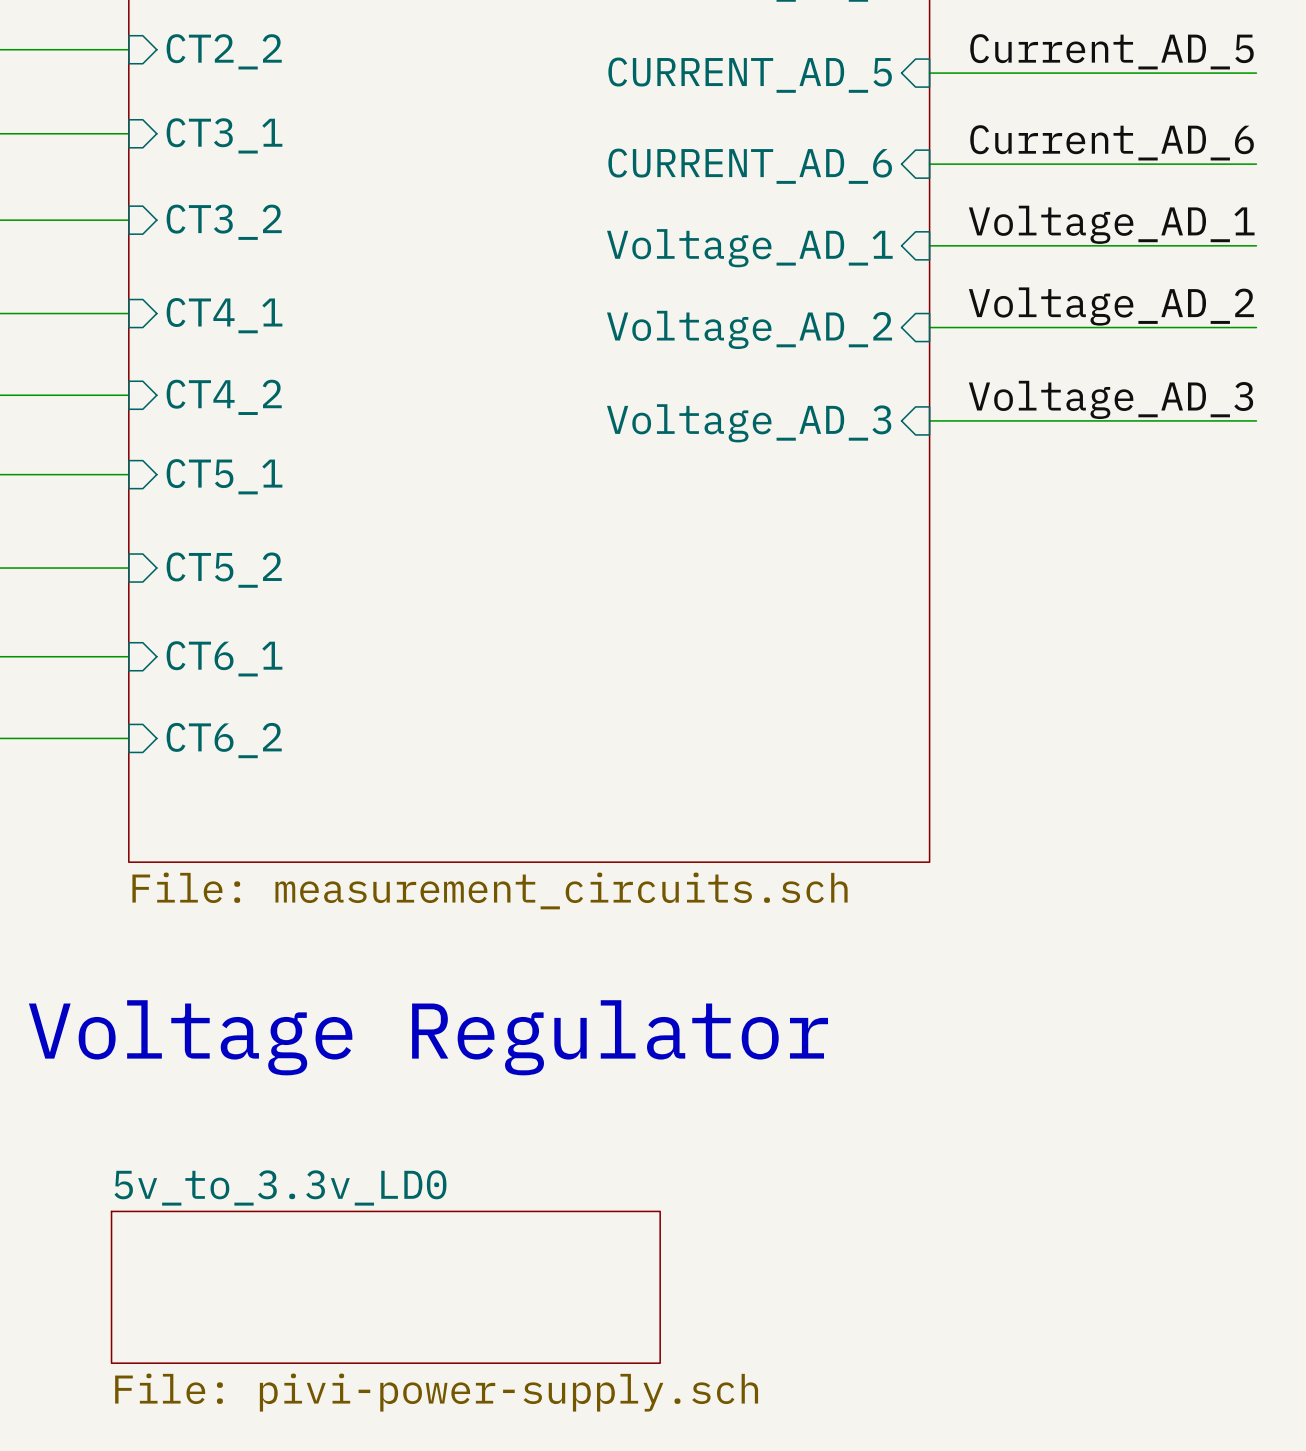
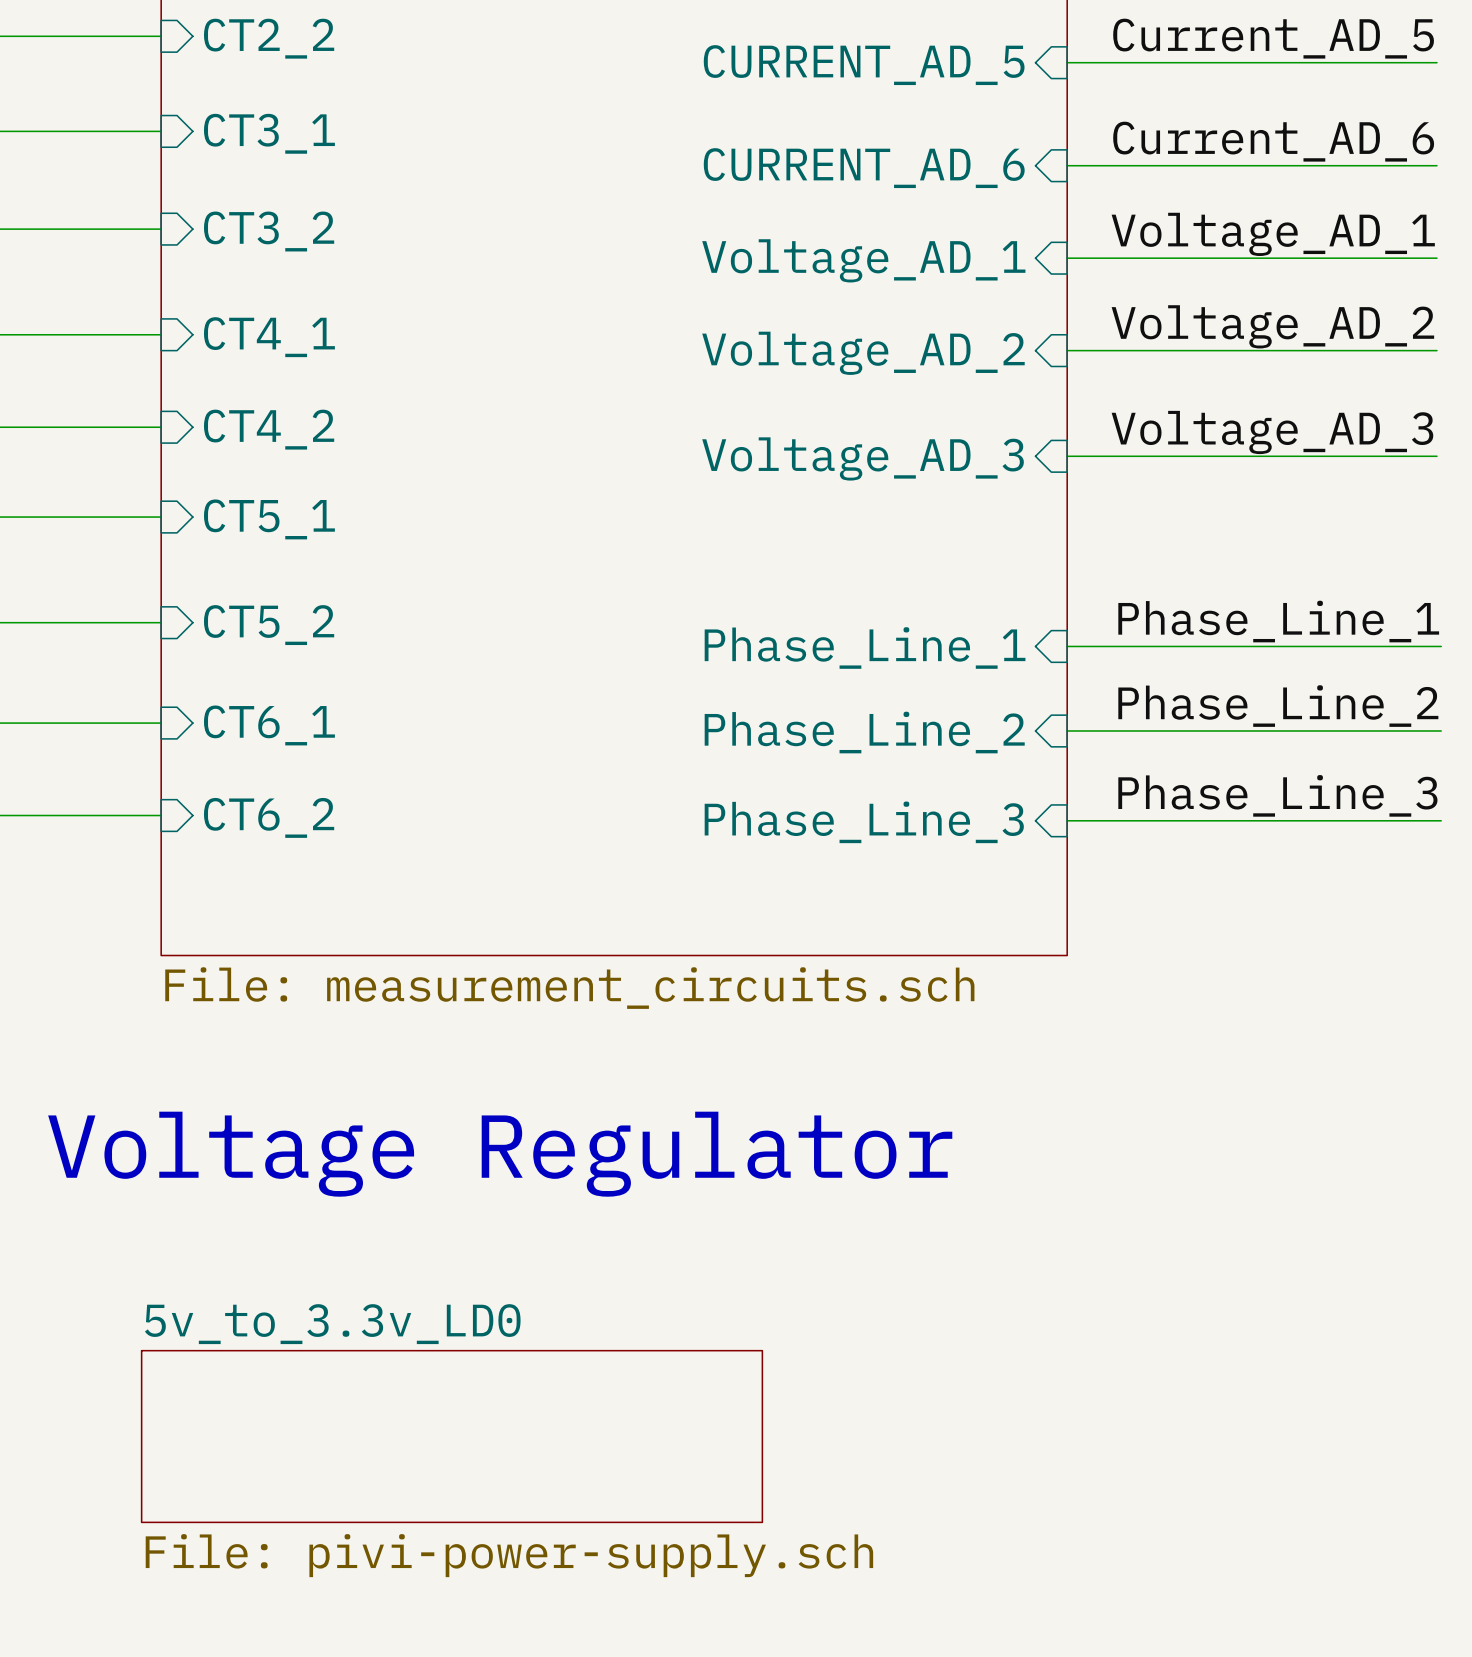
label: none -> Phase_Line_1 (1278, 621)
wire: none -> (1067, 646) (1441, 646)
sheet pin: none -> Phase_Line_1 (865, 647)
label: none -> Phase_Line_2 (1278, 706)
wire: none -> (1067, 730) (1441, 730)
sheet pin: none -> Phase_Line_2 (864, 732)
label: none -> Phase_Line_3 (1277, 795)
wire: none -> (1067, 820) (1441, 820)
sheet pin: none -> Phase_Line_3 (864, 822)

